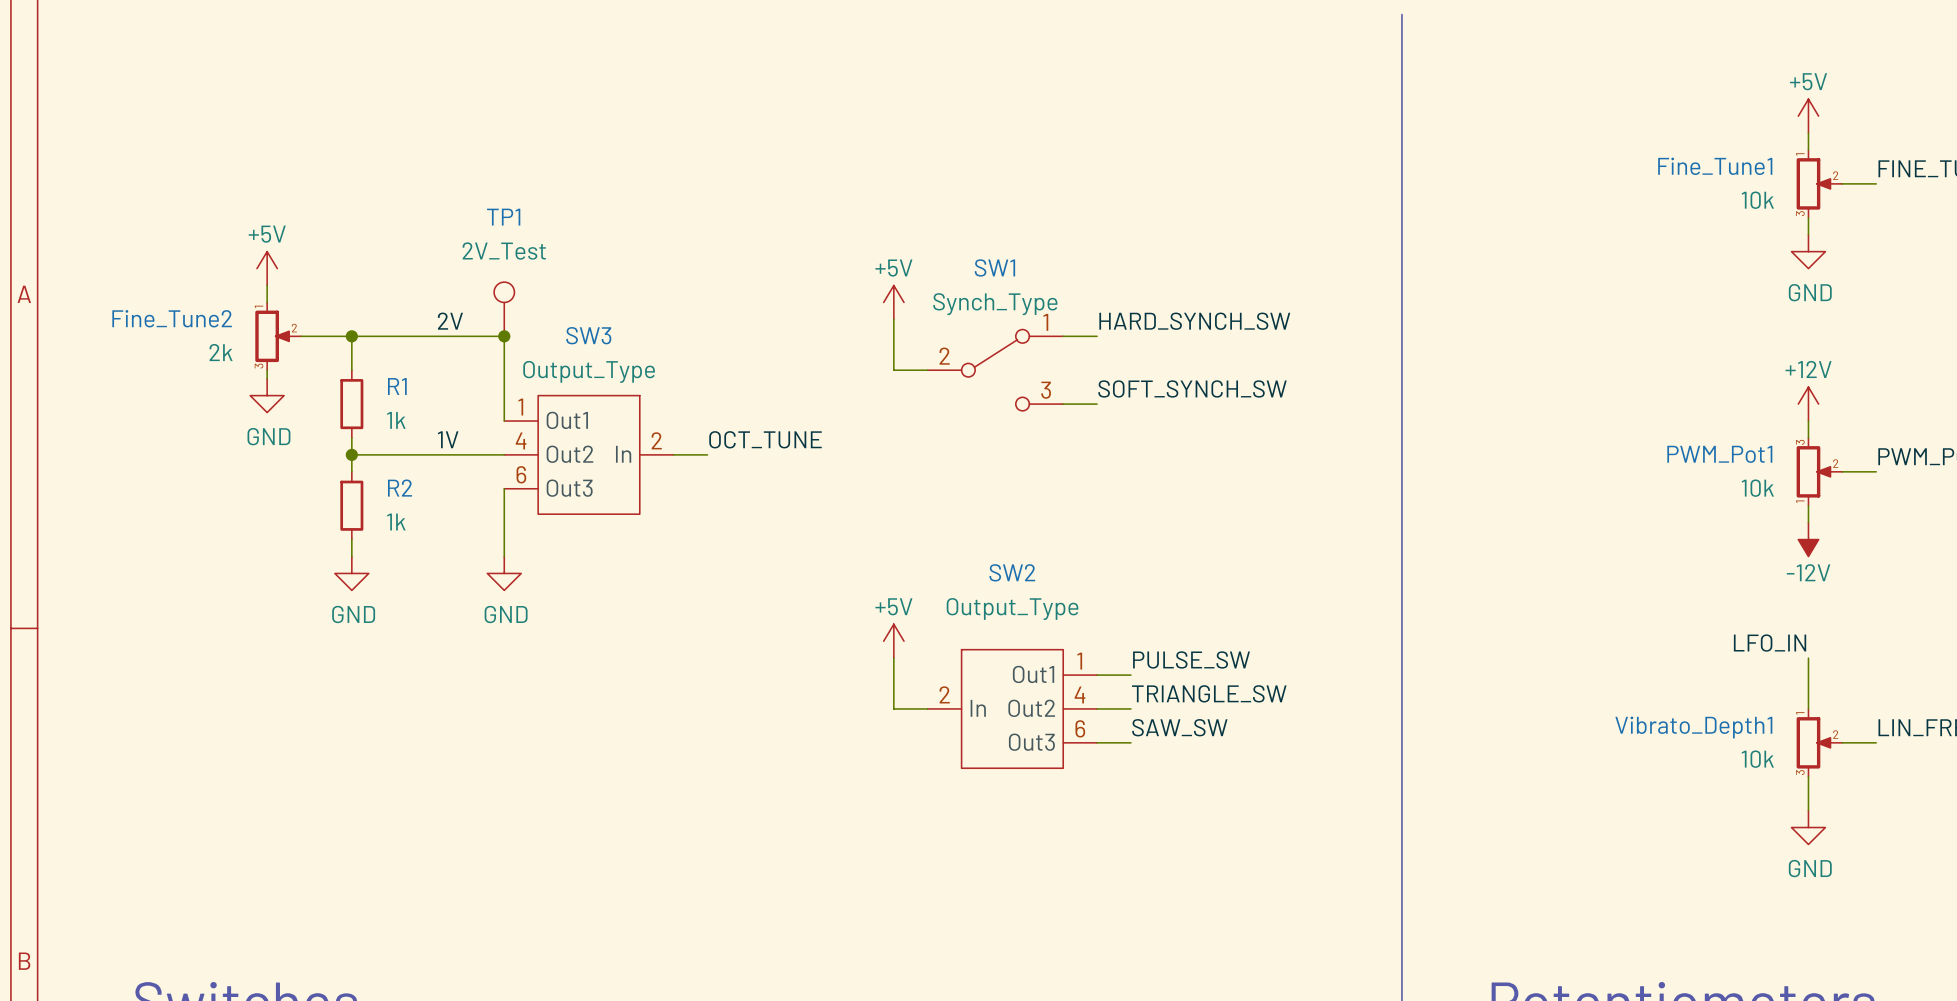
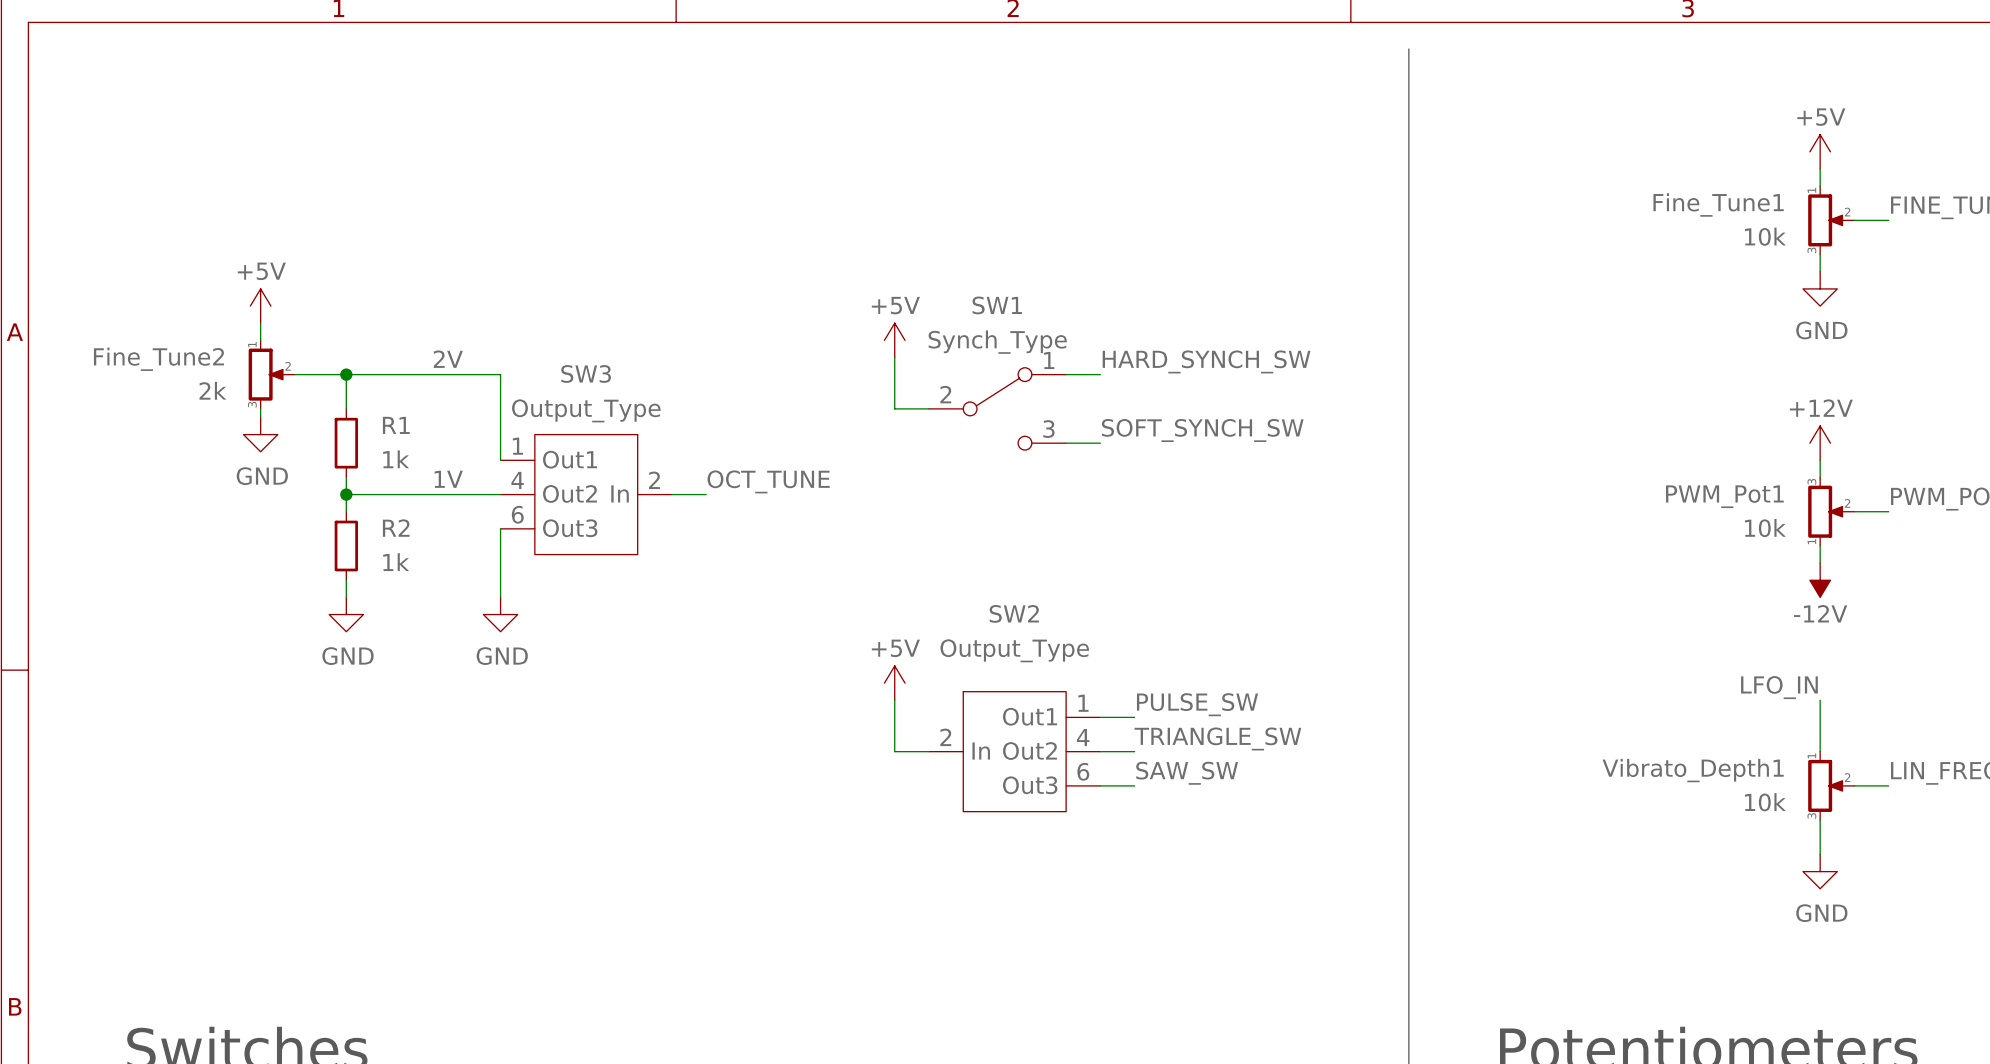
TP1: 2V_Test (504, 309) -> none
junction: (504, 336) -> none

